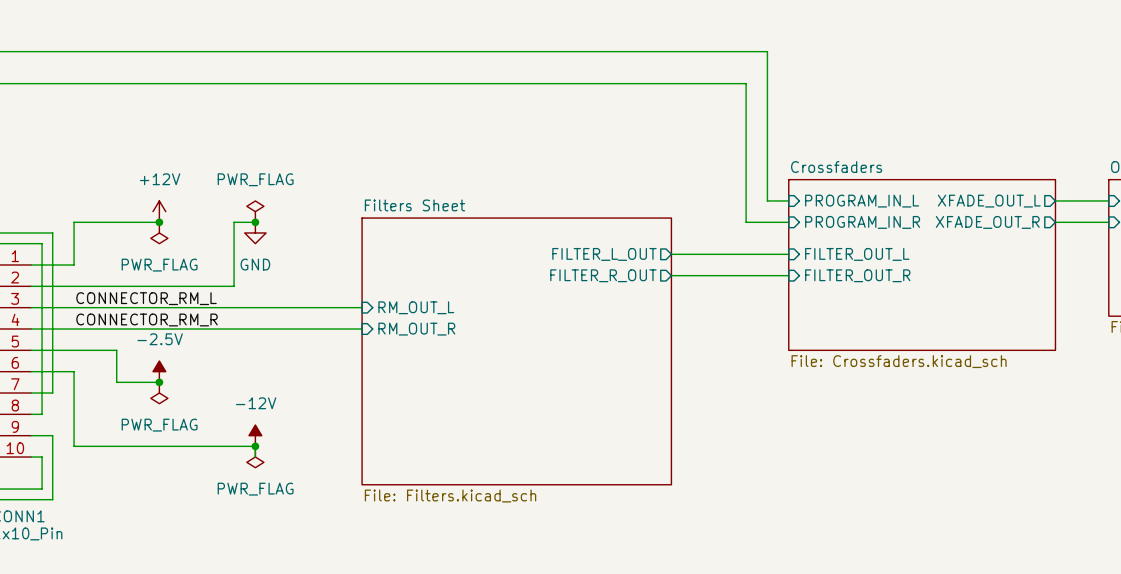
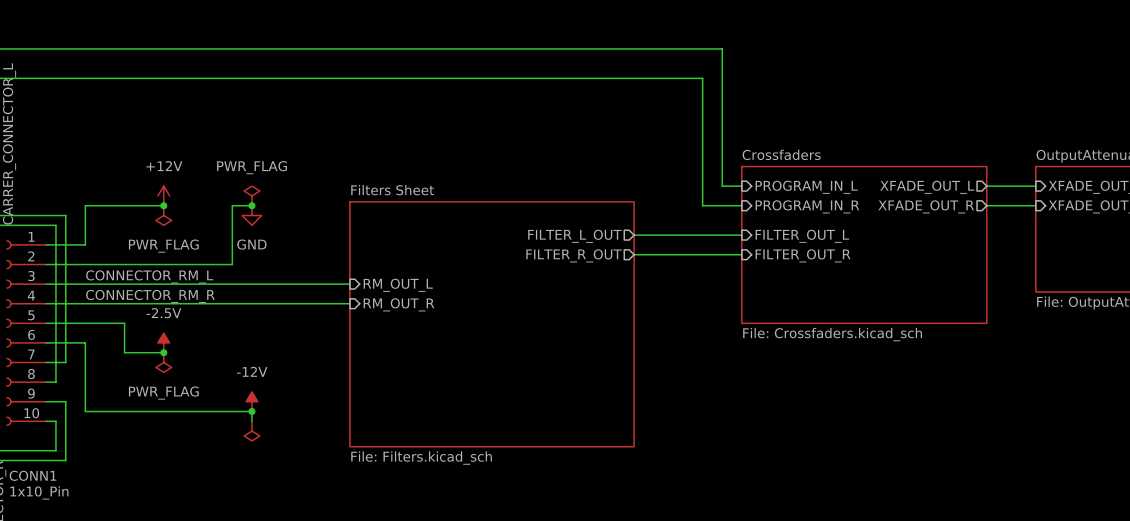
power symbol: PWR_FLAG (255, 457) -> none
power symbol: none -> (251, 431)

